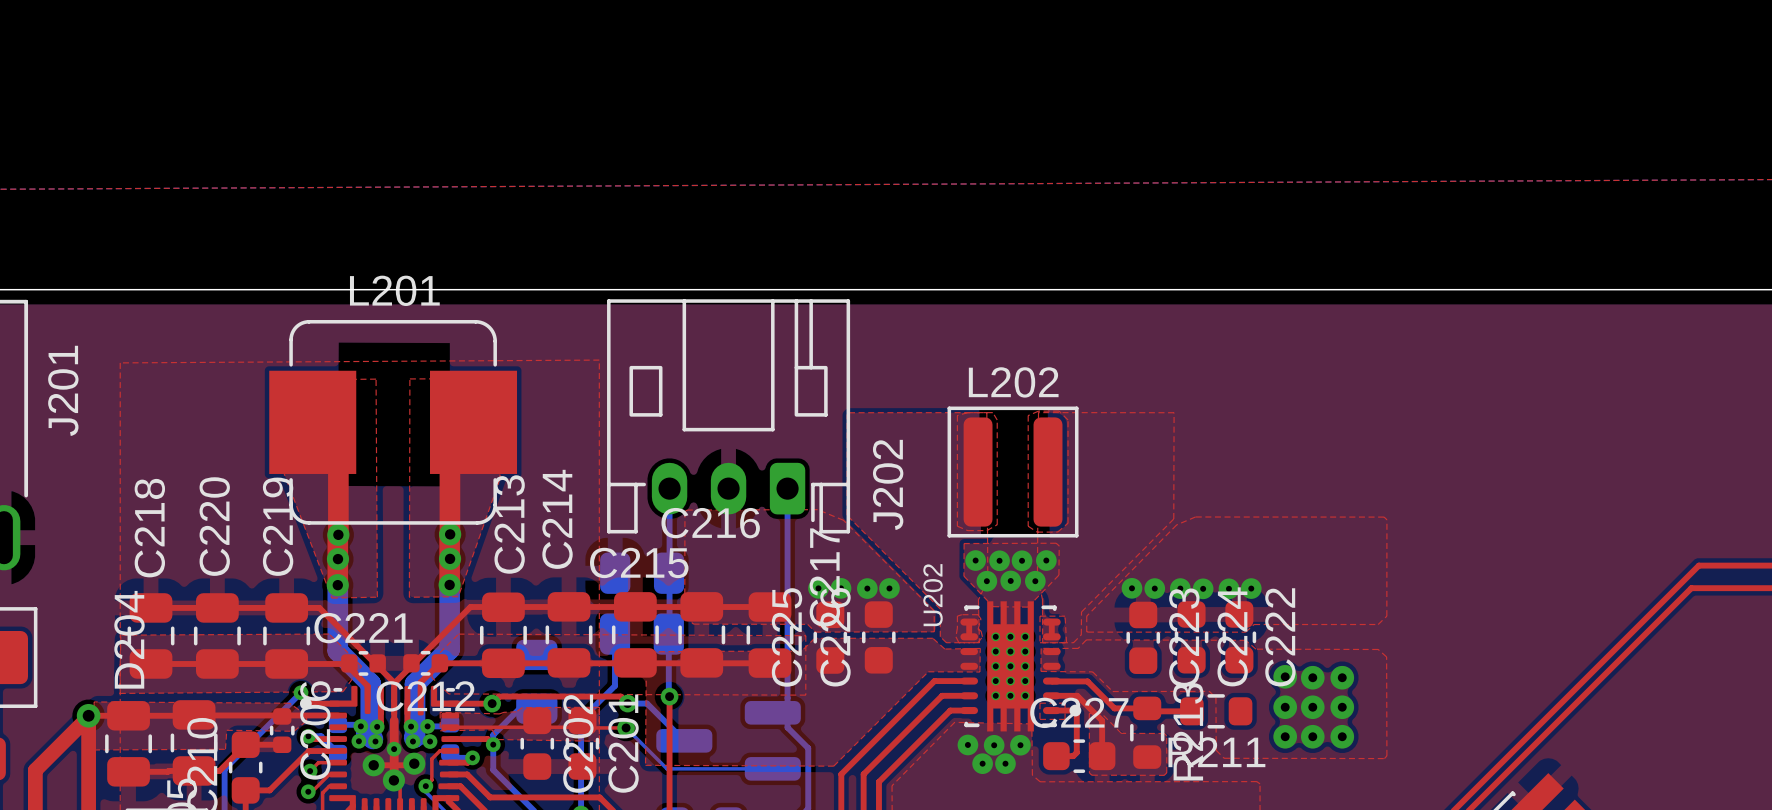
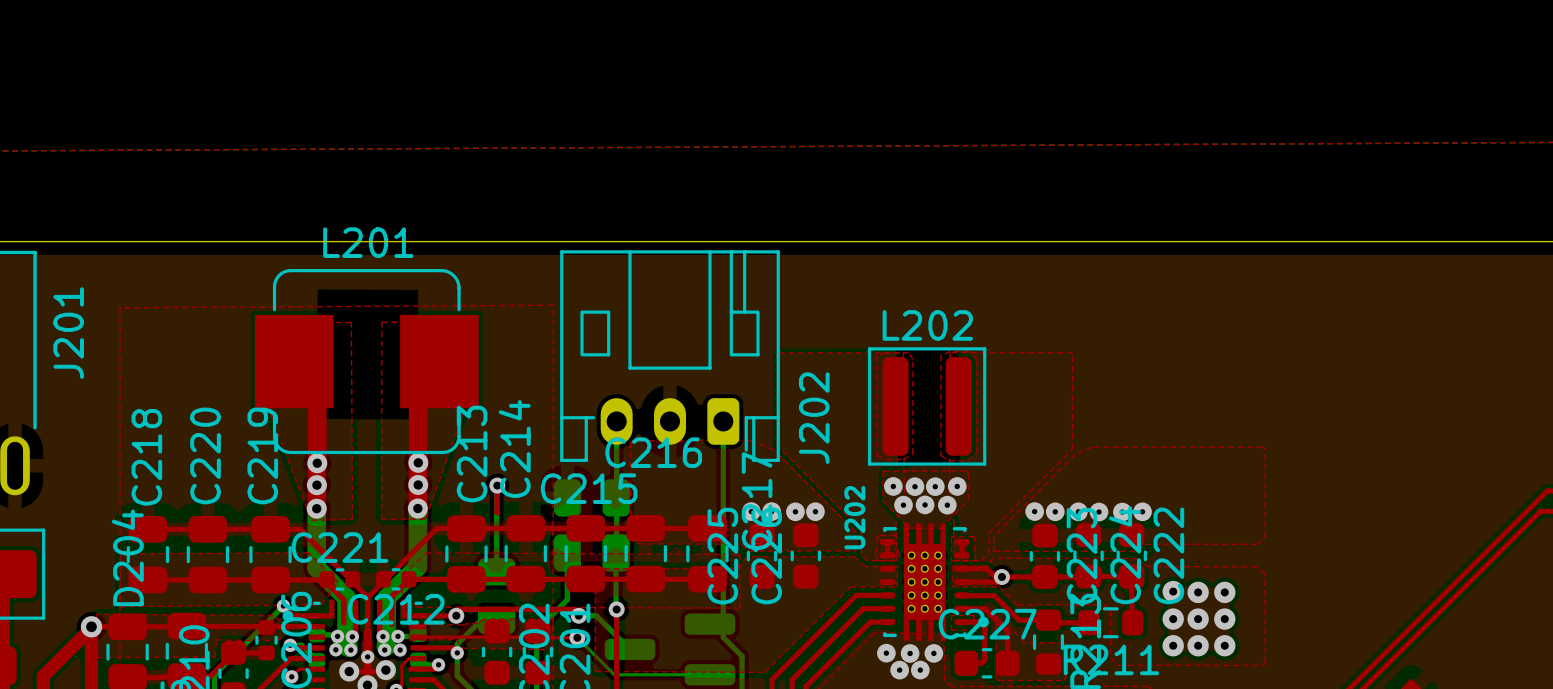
bottom track: none -> (496, 485) (496, 571)
top track: none -> (497, 485) (497, 512)
via: none -> (497, 485)
top track: none -> (962, 568) (986, 568) (998, 580)
via: none -> (1001, 577)
top track: none -> (962, 582) (996, 582) (1001, 577) (1131, 576) (1132, 622)

